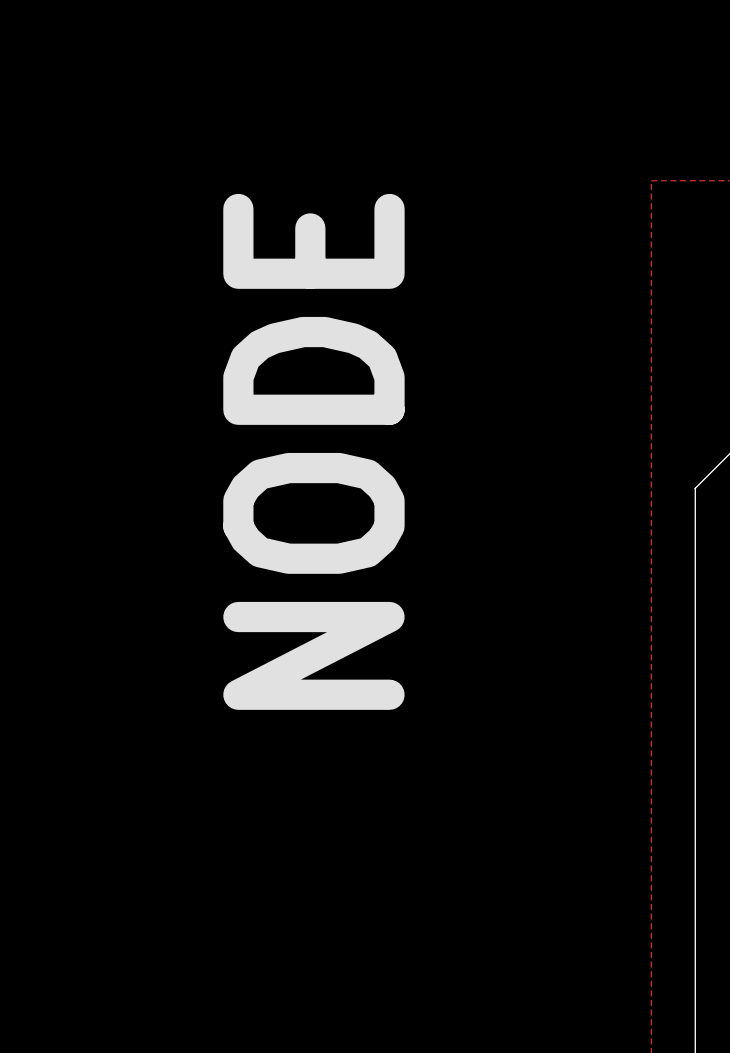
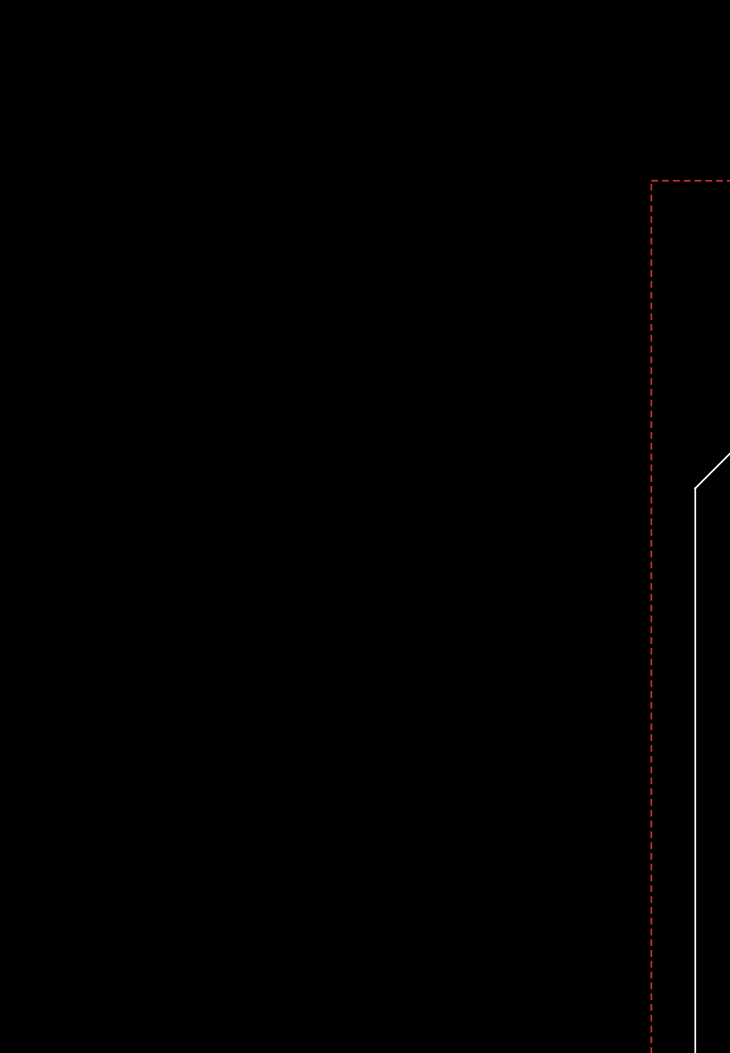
text: NODE (313, 451) -> none

